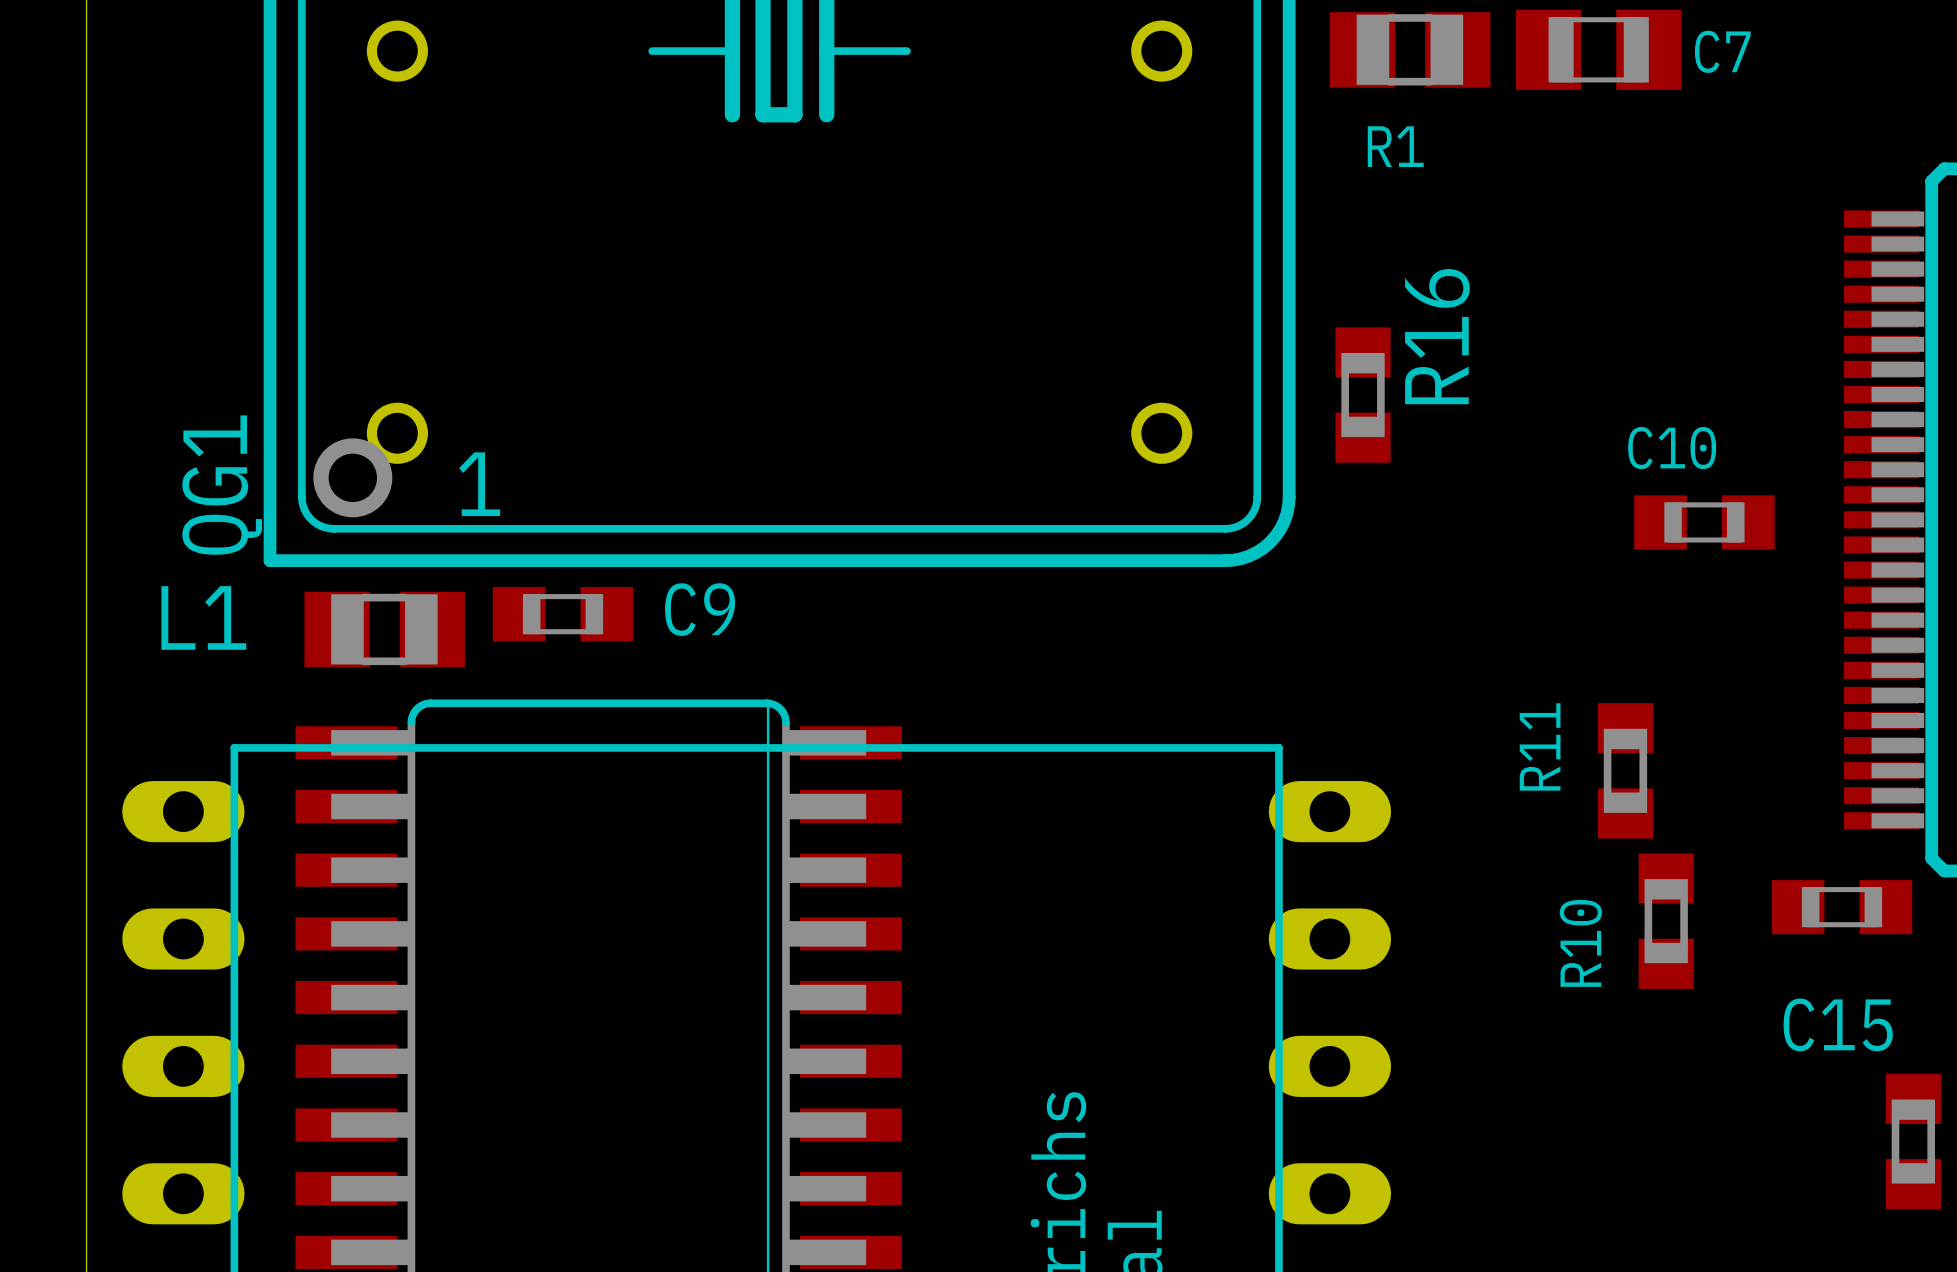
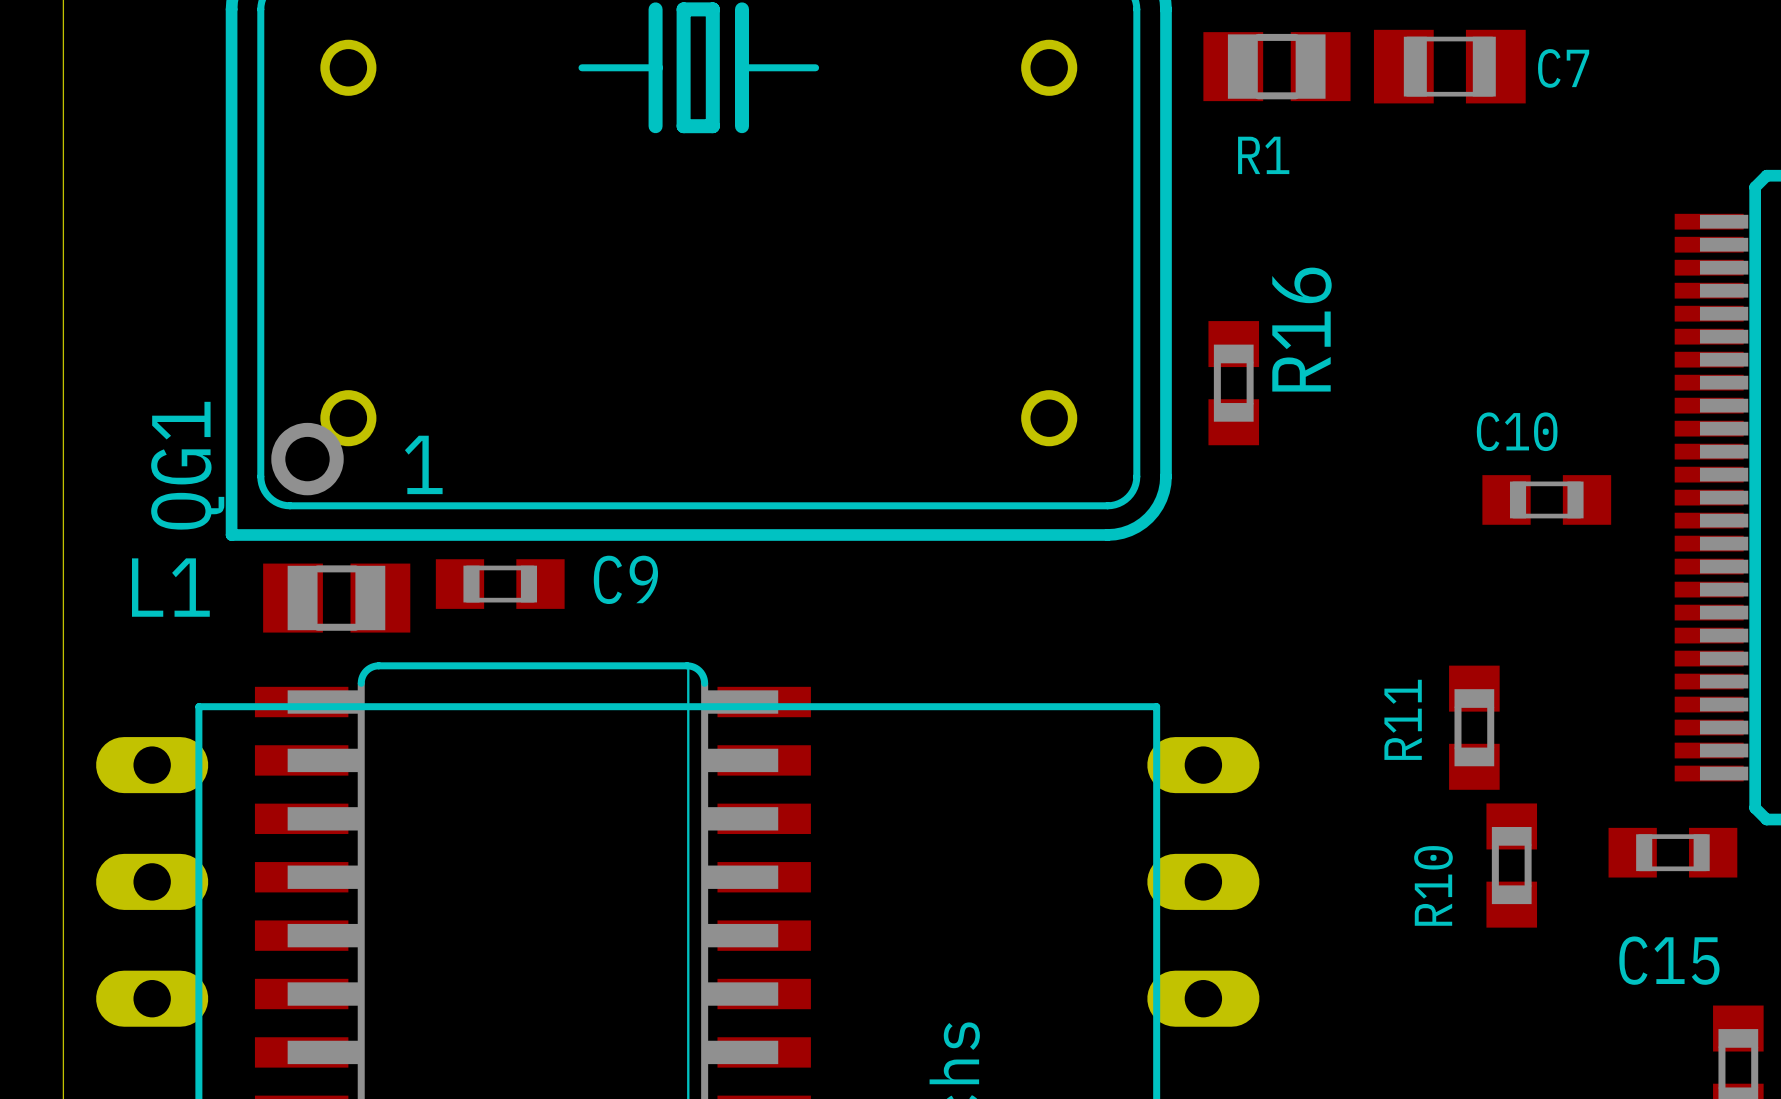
R11 name position: R11 (1540, 746) -> R11 (1403, 719)

